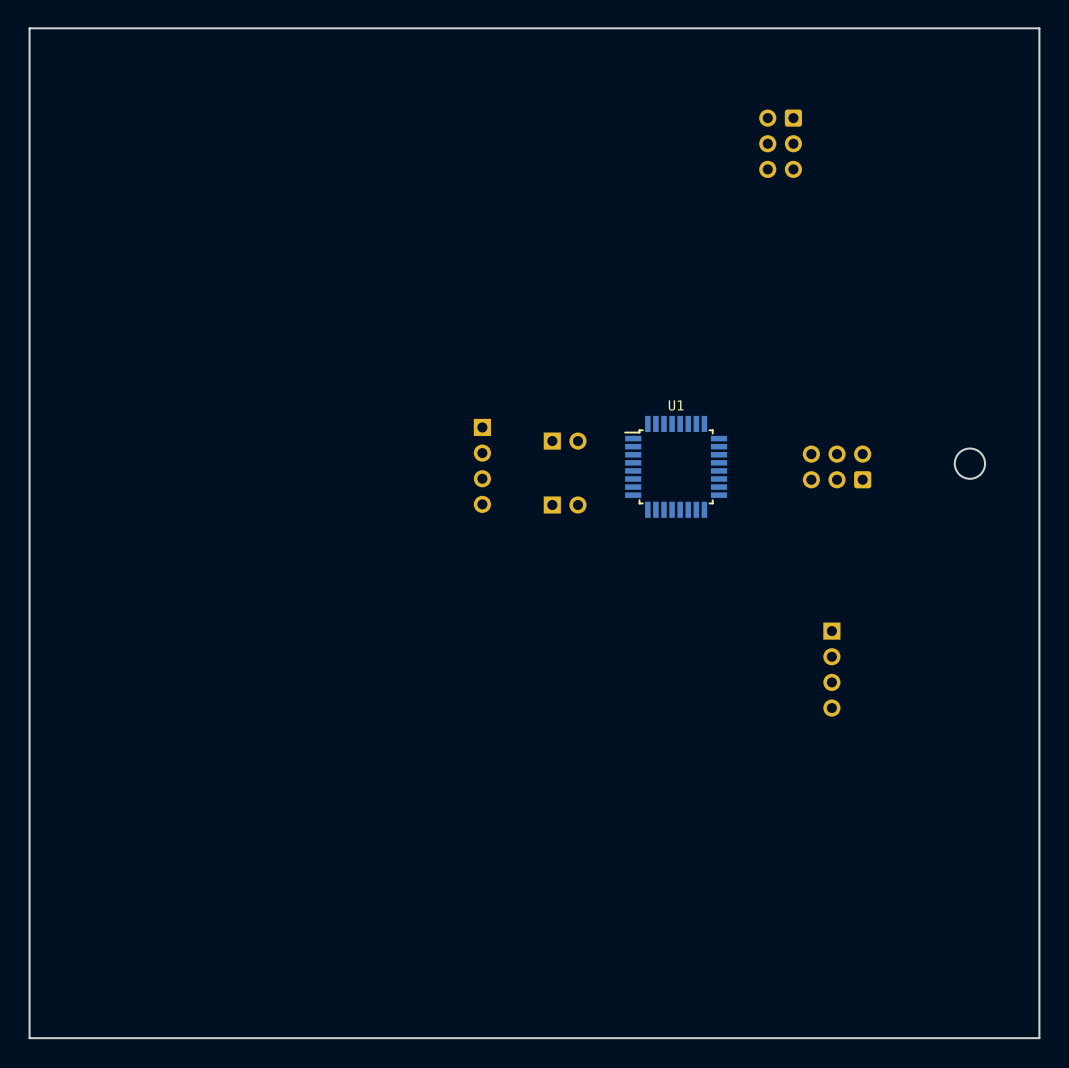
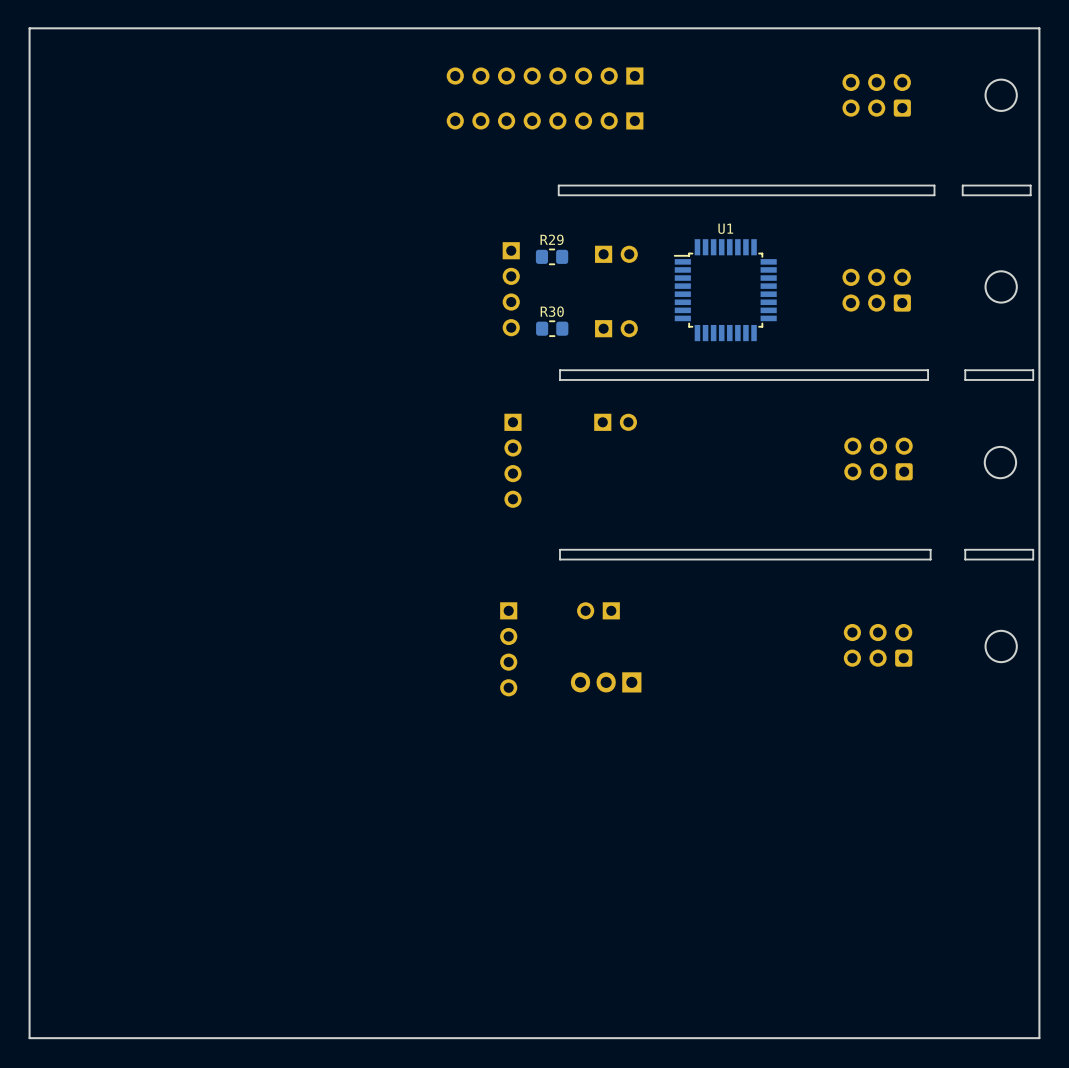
part: none -> (545, 76)
round board edge: none -> [984, 78, 1018, 112]
part: none -> (876, 95)
part: none -> (545, 120)
part: (780, 143) -> none
board edge: none -> (934, 185) (934, 195) (558, 195) (558, 185) (934, 185)
board edge: none -> (1030, 185) (962, 185) (962, 195) (1030, 195) (1030, 185)
part: none -> (616, 254)
R29: none -> (552, 256)
round board edge: none -> [984, 270, 1018, 304]
part: none -> (511, 289)
part: none -> (876, 290)
R30: none -> (552, 328)
part: none -> (616, 328)
board edge: none -> (928, 370) (928, 379) (560, 379) (560, 370) (928, 370)
board edge: none -> (1033, 370) (965, 370) (965, 379) (1033, 379) (1033, 370)
part: none -> (615, 422)
part: (565, 441) -> none
round board edge: none -> [983, 445, 1018, 480]
round board edge: [953, 447, 987, 480] -> none
part position: (482, 465) -> (512, 460)
U1 position: (675, 466) -> (725, 290)
part position: (837, 466) -> (878, 458)
part: (565, 505) -> none
board edge: none -> (930, 549) (560, 549) (560, 559) (930, 559) (930, 549)
board edge: none -> (1033, 549) (1033, 559) (965, 559) (965, 549) (1033, 549)
part: none -> (598, 610)
round board edge: none -> [984, 629, 1018, 664]
part: none -> (878, 645)
part: none -> (508, 649)
part: (831, 669) -> none
part: none -> (606, 682)

